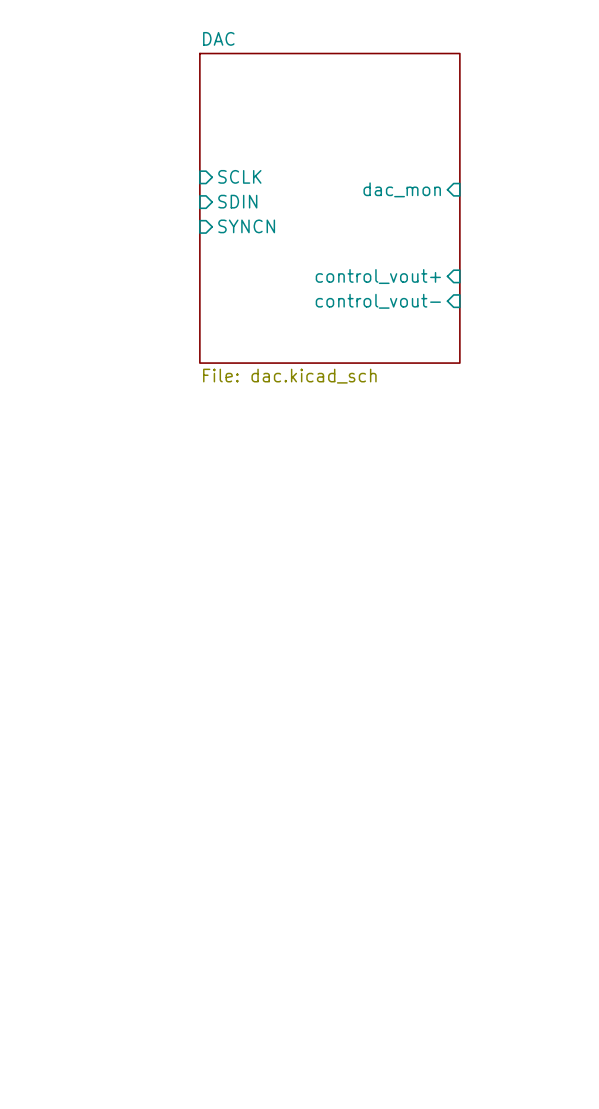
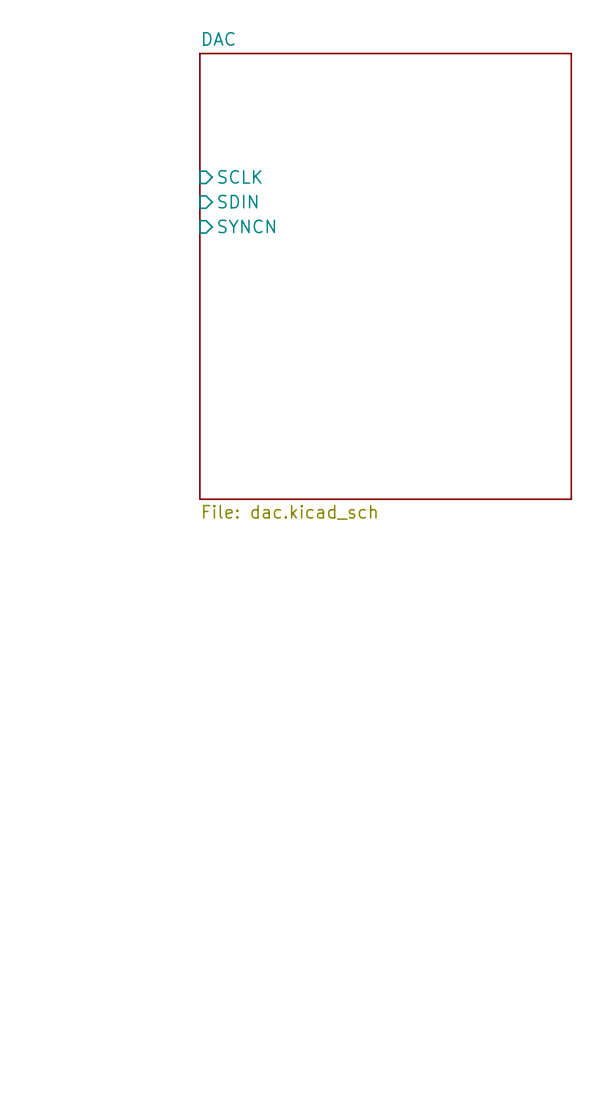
sheet pin: dac_mon (402, 189) -> none
sheet DAC: File: dac.kicad_sch (329, 208) -> none
sheet pin: control_vout+ (378, 276) -> none
sheet DAC: none -> File: dac.kicad_sch (385, 276)
sheet pin: control_vout- (378, 301) -> none

